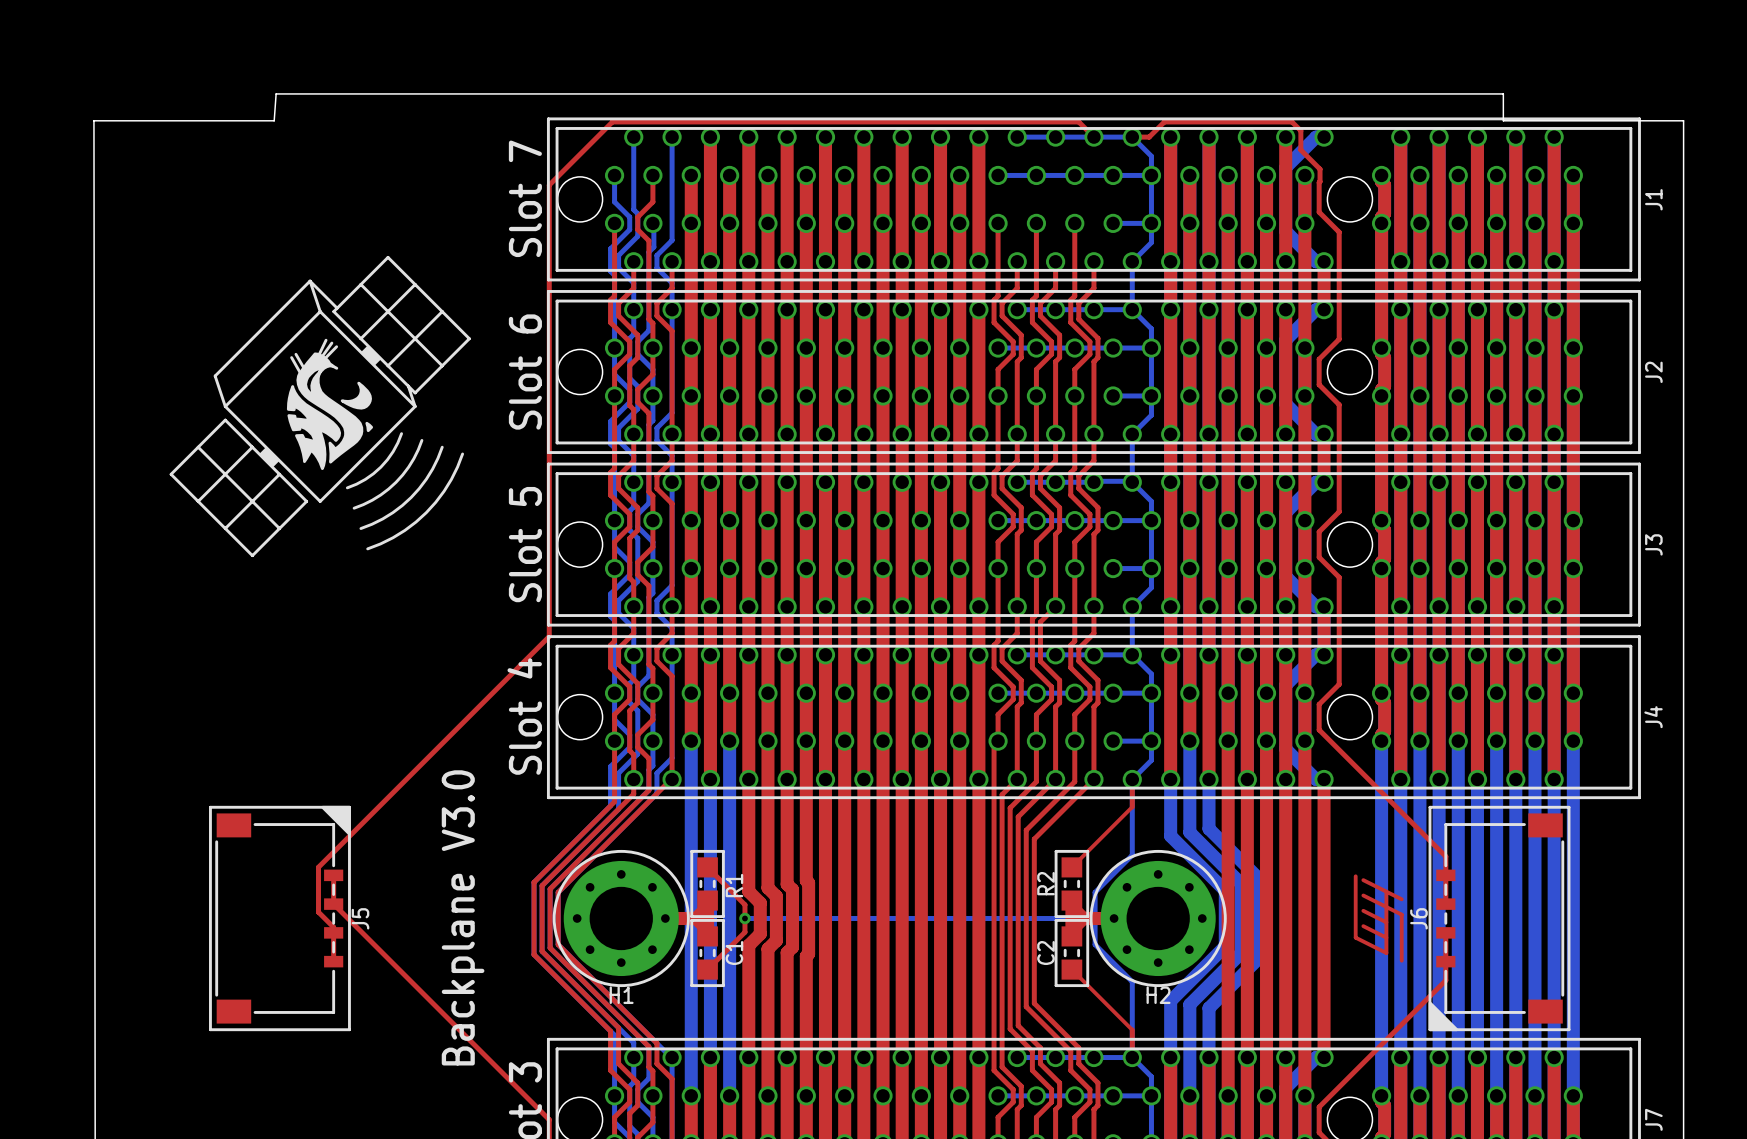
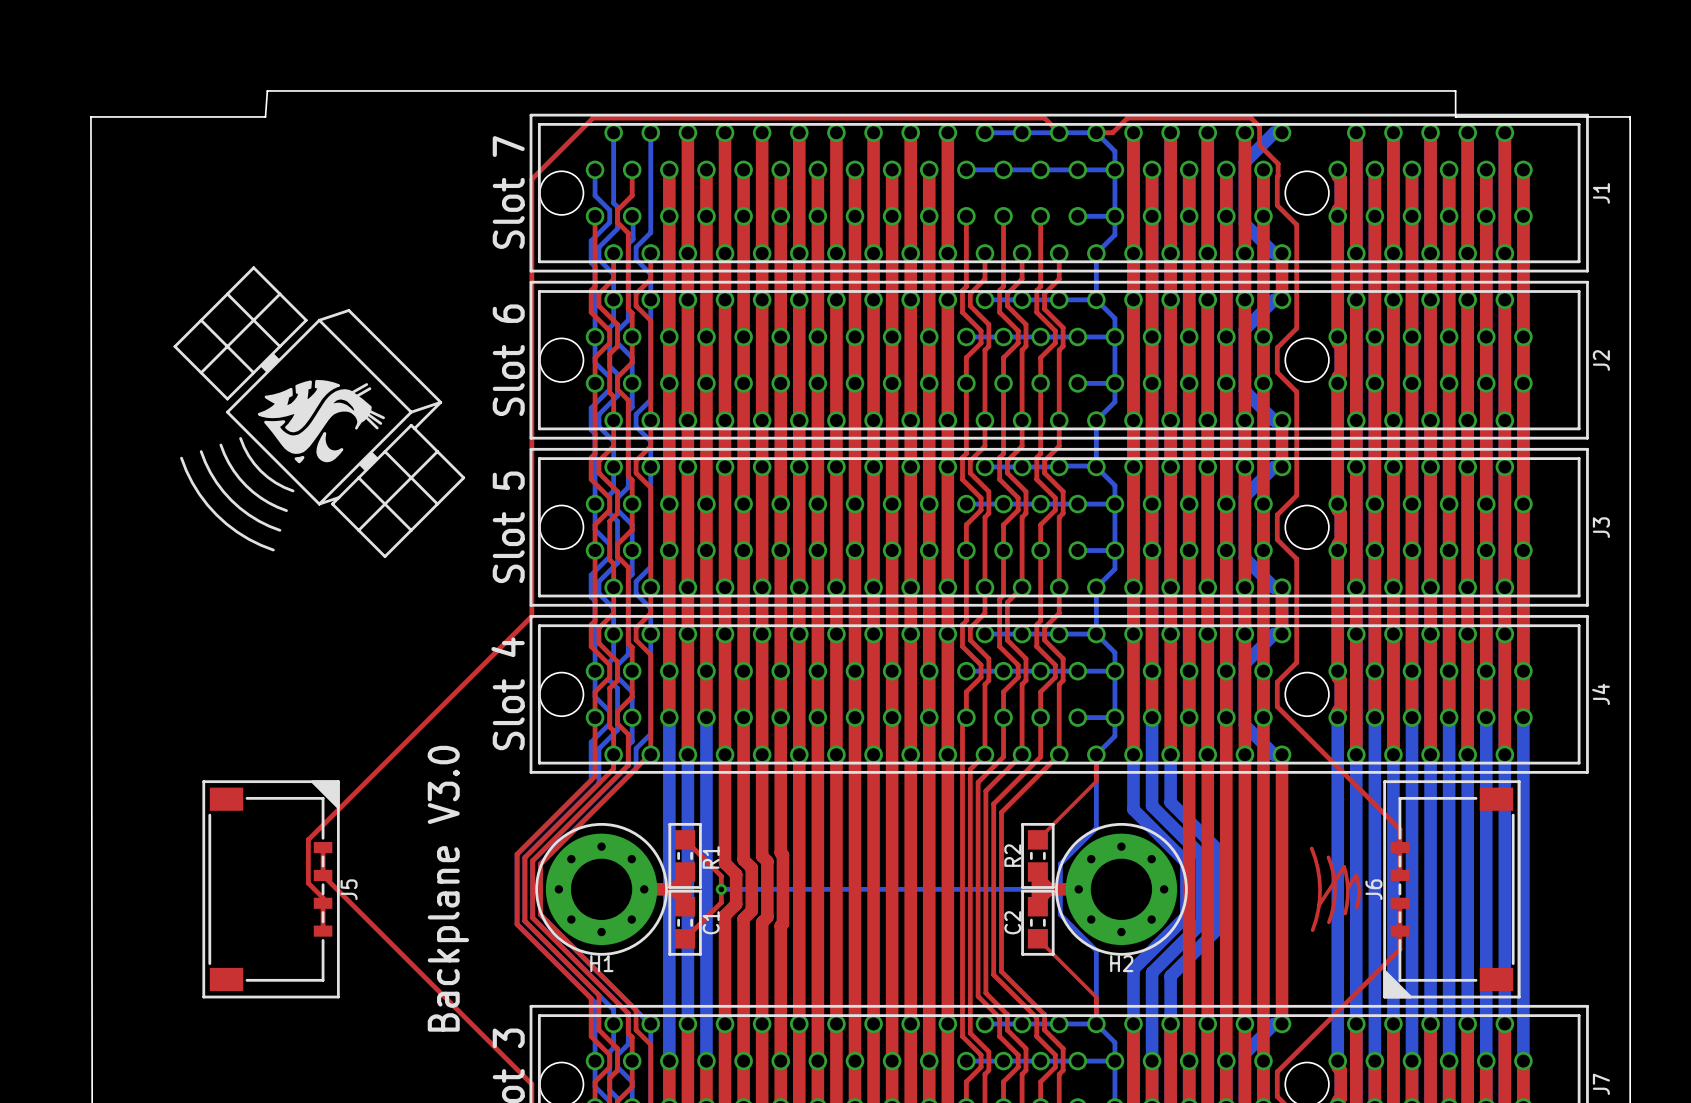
drawing: [169, 255, 471, 558] -> none
drawing: none -> [173, 266, 466, 558]
drawing shape: [1353, 874, 1404, 963] -> [1309, 846, 1361, 933]

